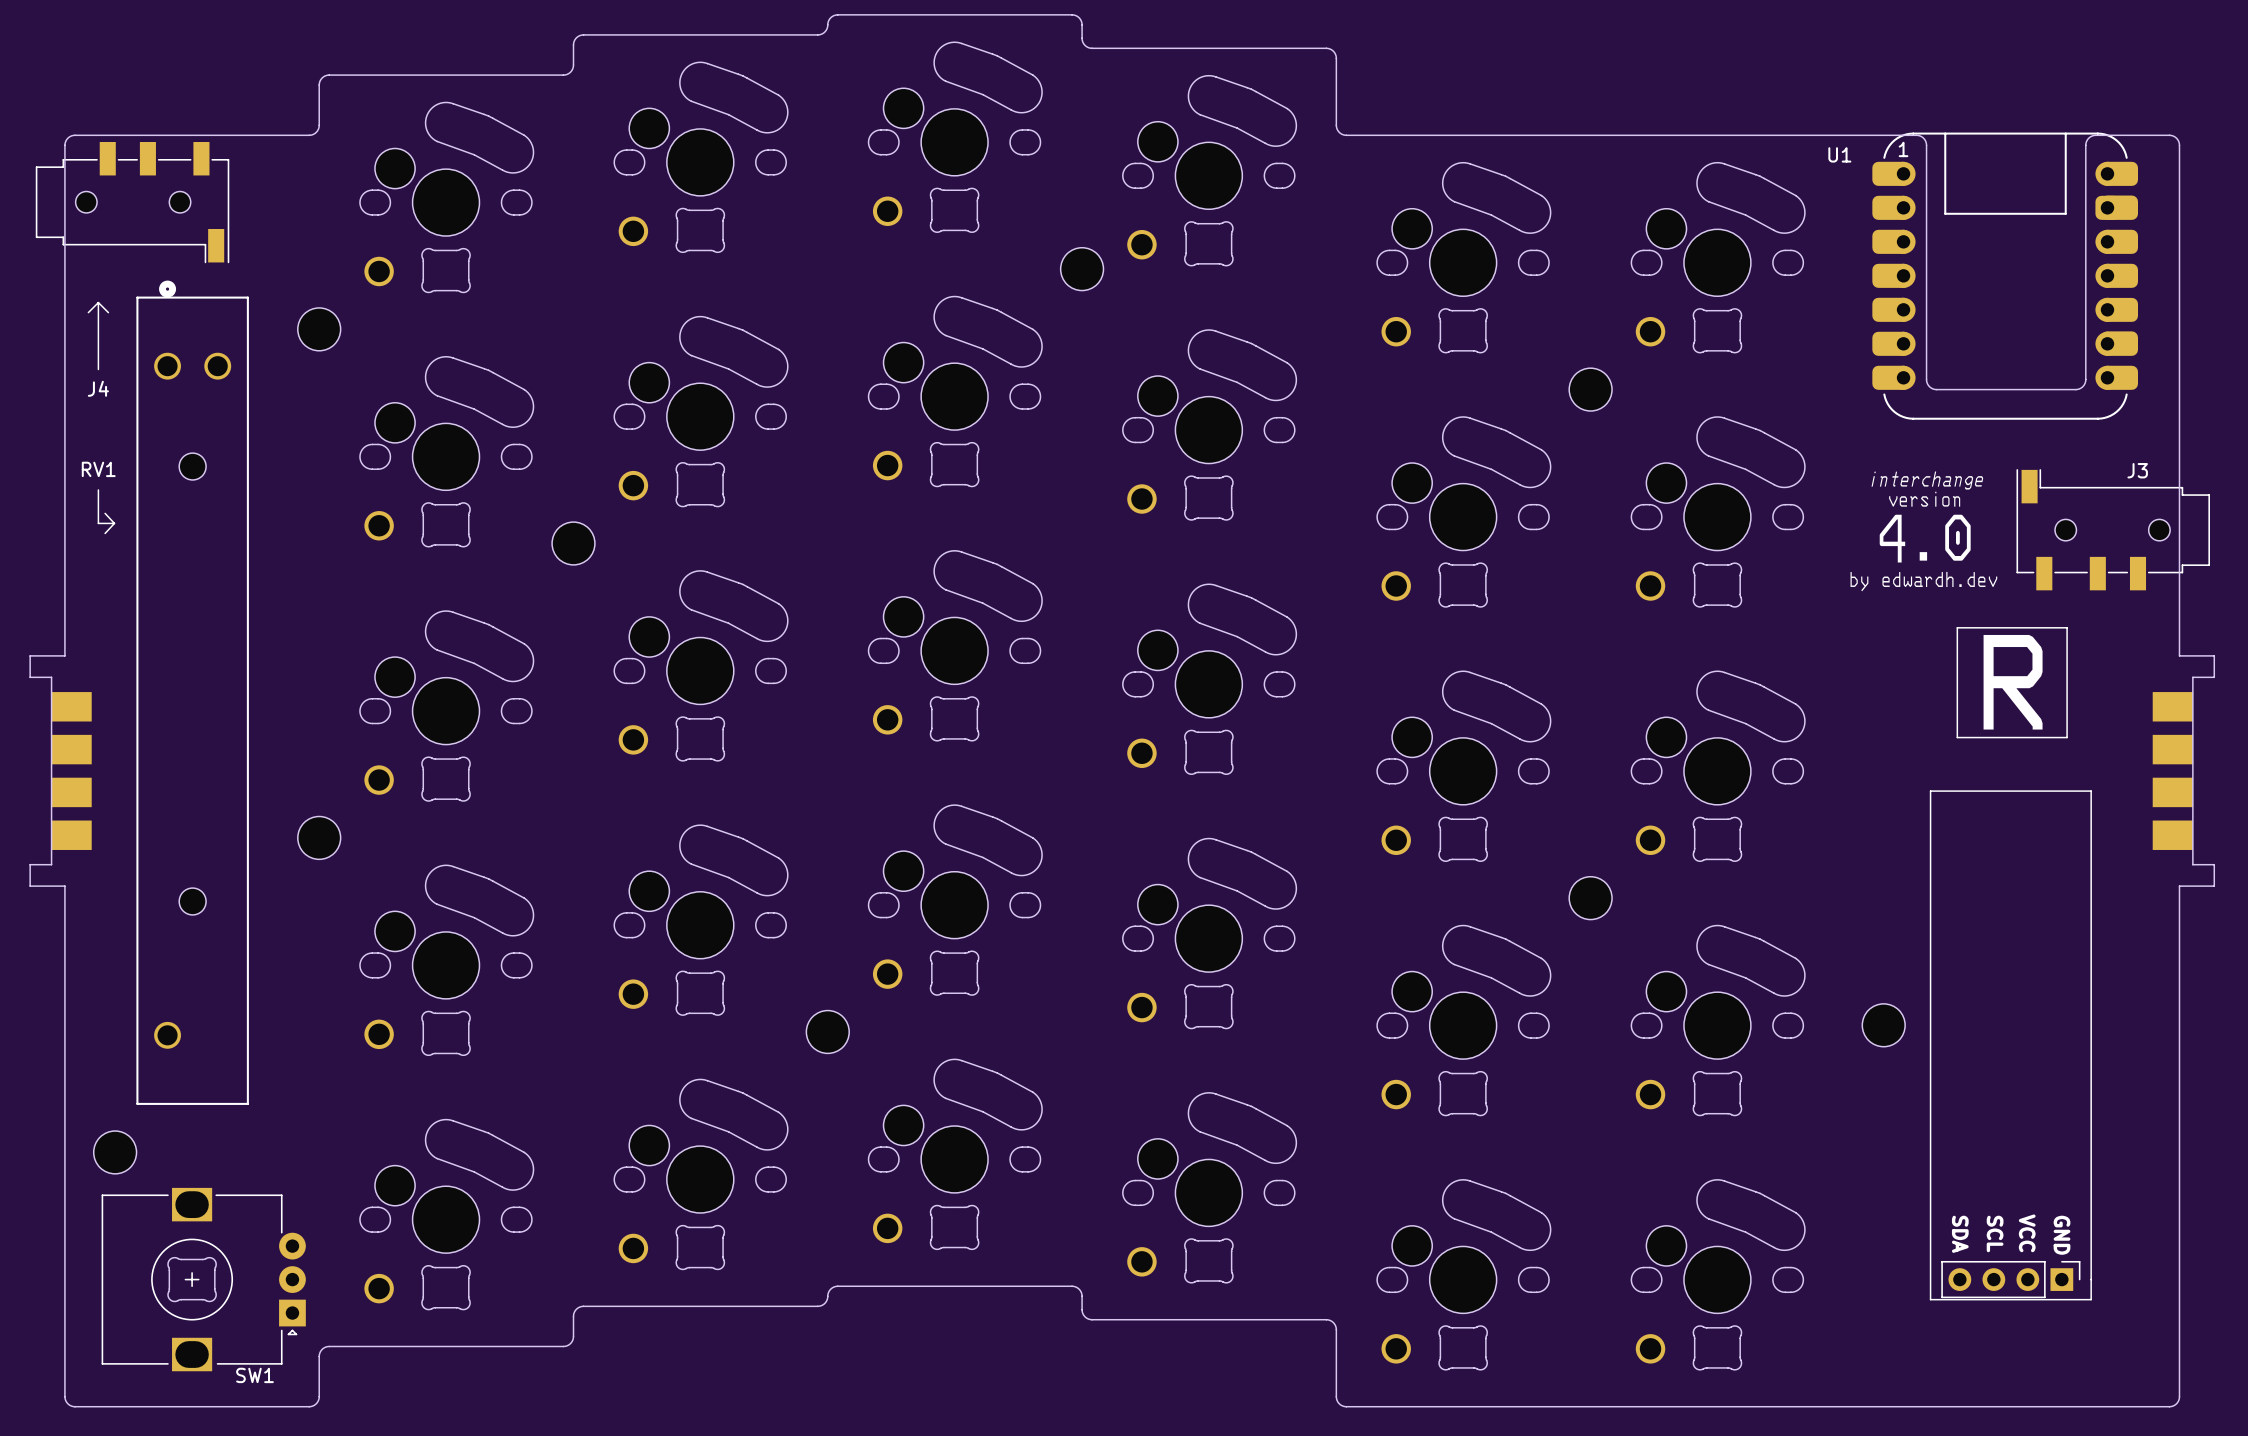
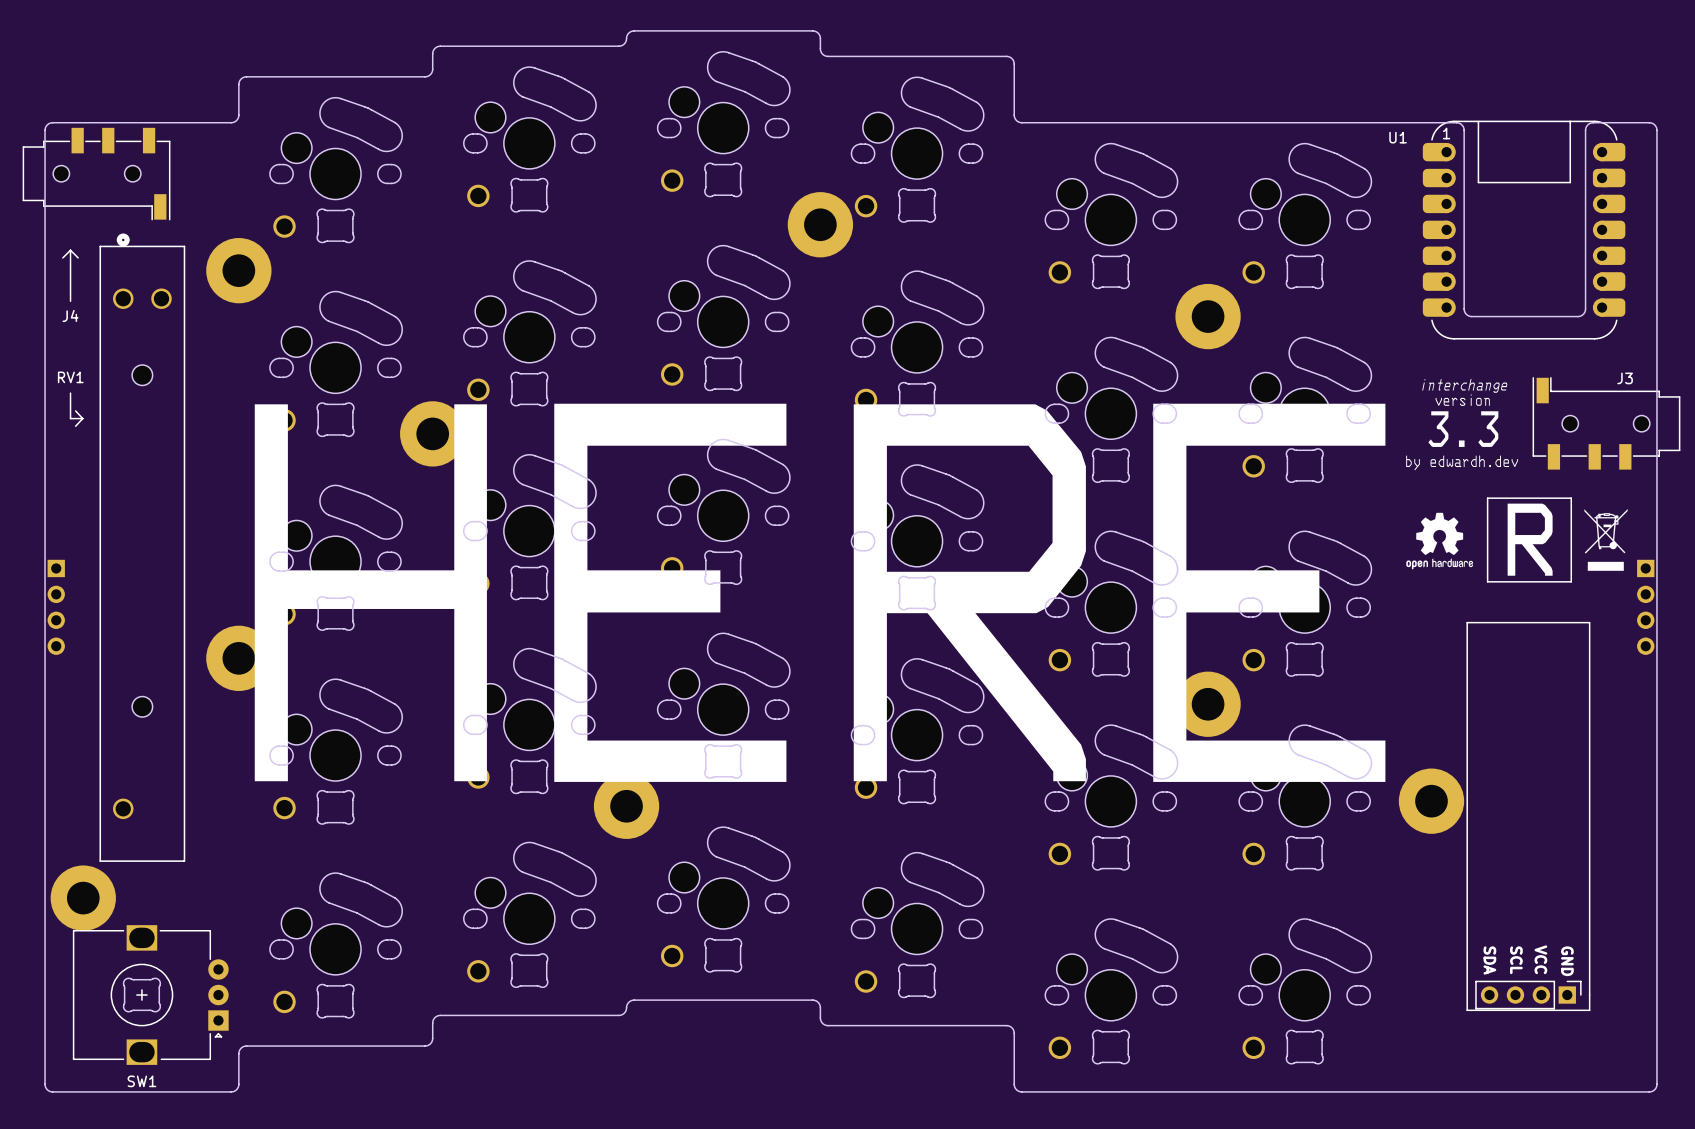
part footprint: [1060, 247, 1104, 291] -> [787, 192, 854, 258]
part footprint: [297, 307, 341, 351] -> [206, 238, 272, 304]
part footprint: [1569, 368, 1613, 412] -> [1175, 283, 1241, 350]
drawing: none -> [554, 403, 787, 782]
drawing: none -> [1153, 403, 1386, 782]
drawing: none -> [254, 404, 487, 782]
drawing: none -> [853, 404, 1086, 782]
drawing: none -> [1478, 411, 1499, 447]
drawing shape: [1879, 514, 1906, 563] -> [1428, 411, 1449, 447]
drawing: [1945, 514, 1971, 561] -> none
part footprint: [552, 522, 595, 565] -> [400, 401, 466, 467]
drawing: none -> [1584, 509, 1628, 571]
drawing: none -> [1406, 512, 1474, 570]
board edge: none -> (45, 519) (45, 695)
board edge: none -> (1656, 519) (1656, 695)
part: (60, 771) -> none
part: none -> (56, 607)
part: none -> (1645, 607)
part: (2183, 771) -> none
part footprint: [297, 816, 341, 860] -> [206, 625, 272, 691]
part footprint: [1569, 876, 1613, 920] -> [1175, 671, 1241, 737]
part footprint: [1862, 1003, 1906, 1047] -> [1398, 768, 1465, 834]
part footprint: [806, 1010, 850, 1054] -> [593, 773, 660, 839]
part footprint: [93, 1131, 137, 1174] -> [50, 865, 116, 931]
SW1 name position: SW1 (254, 1375) -> SW1 (141, 1081)

